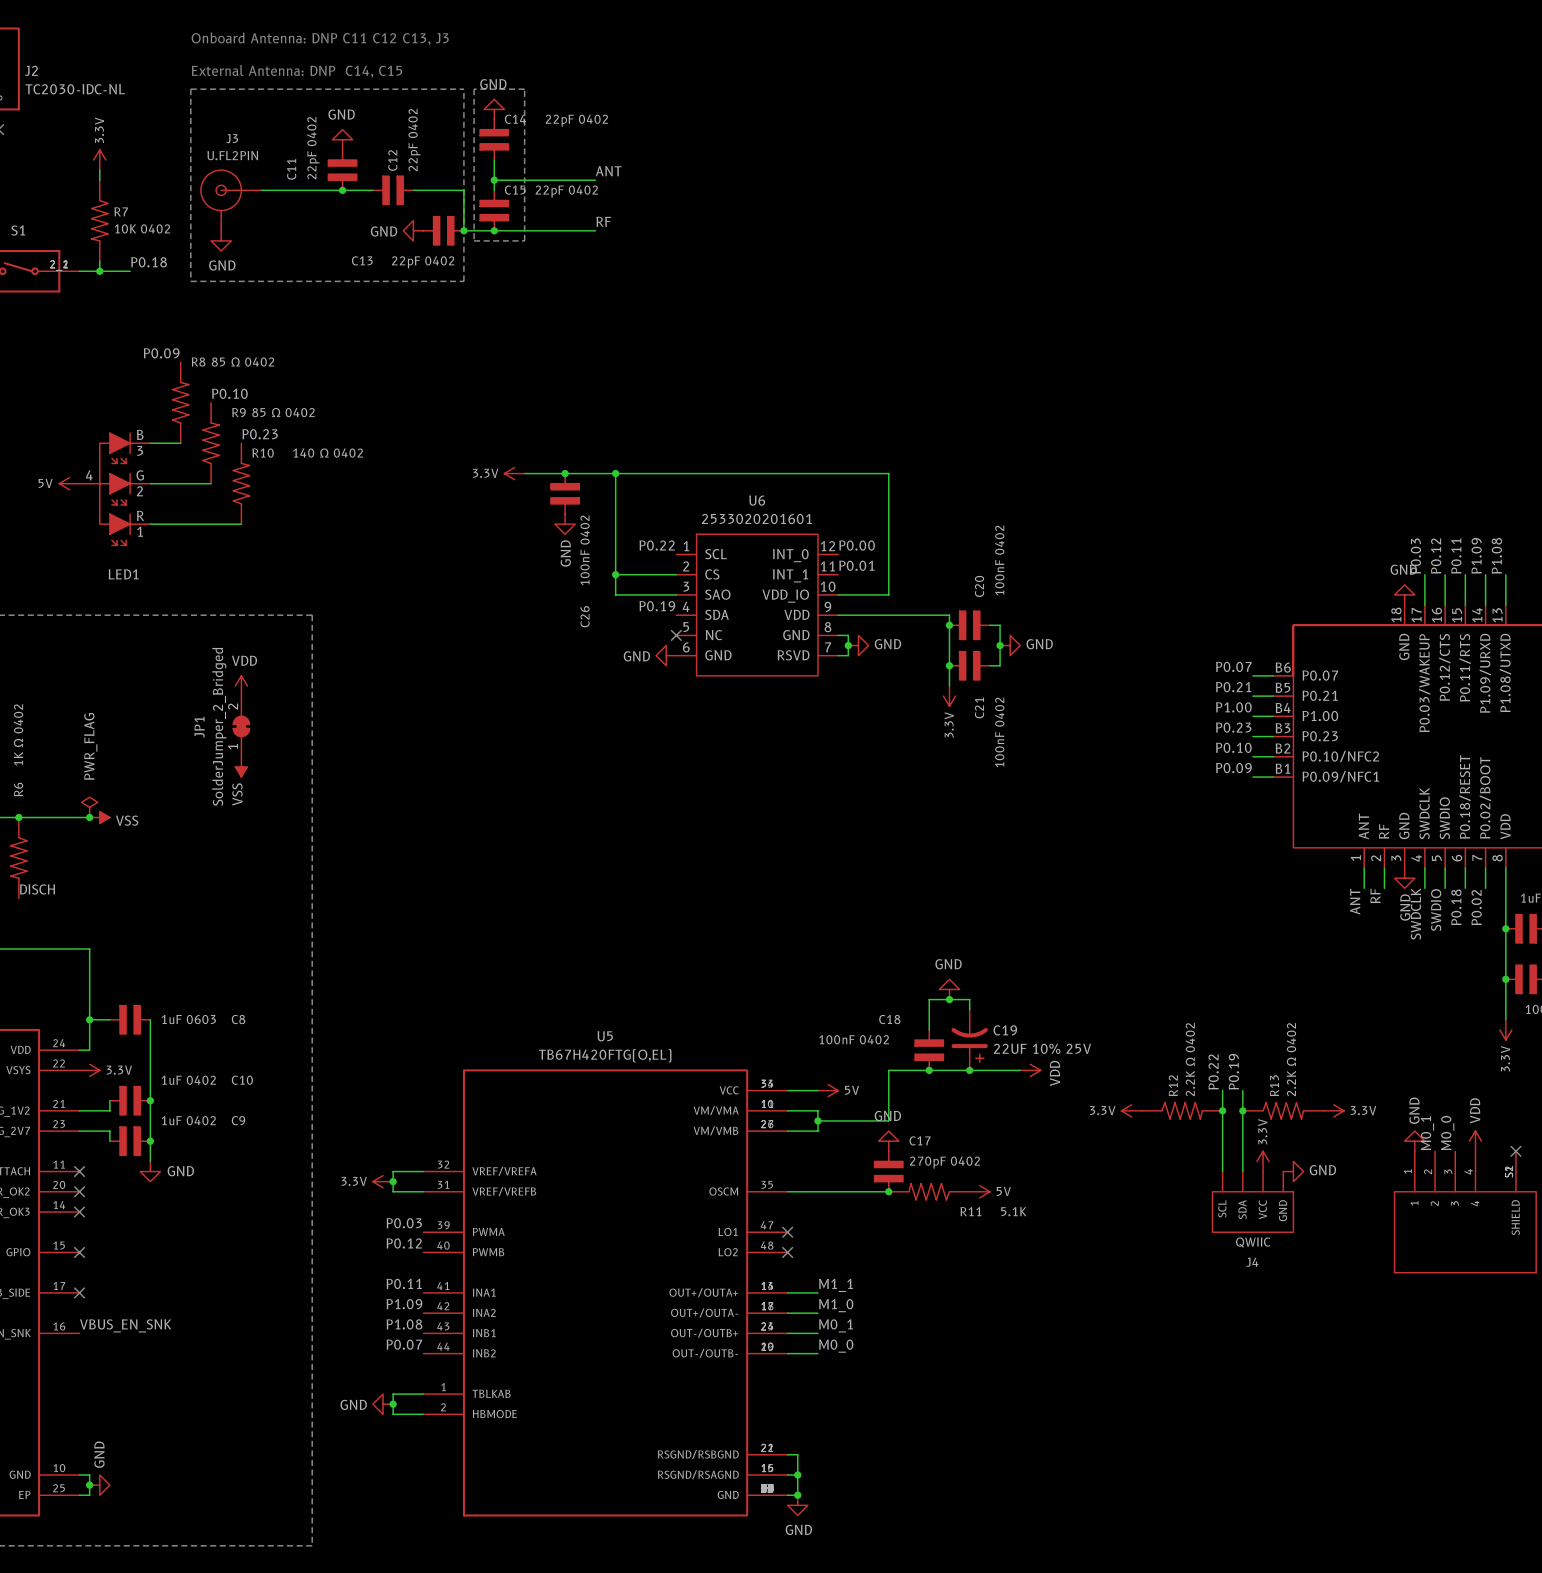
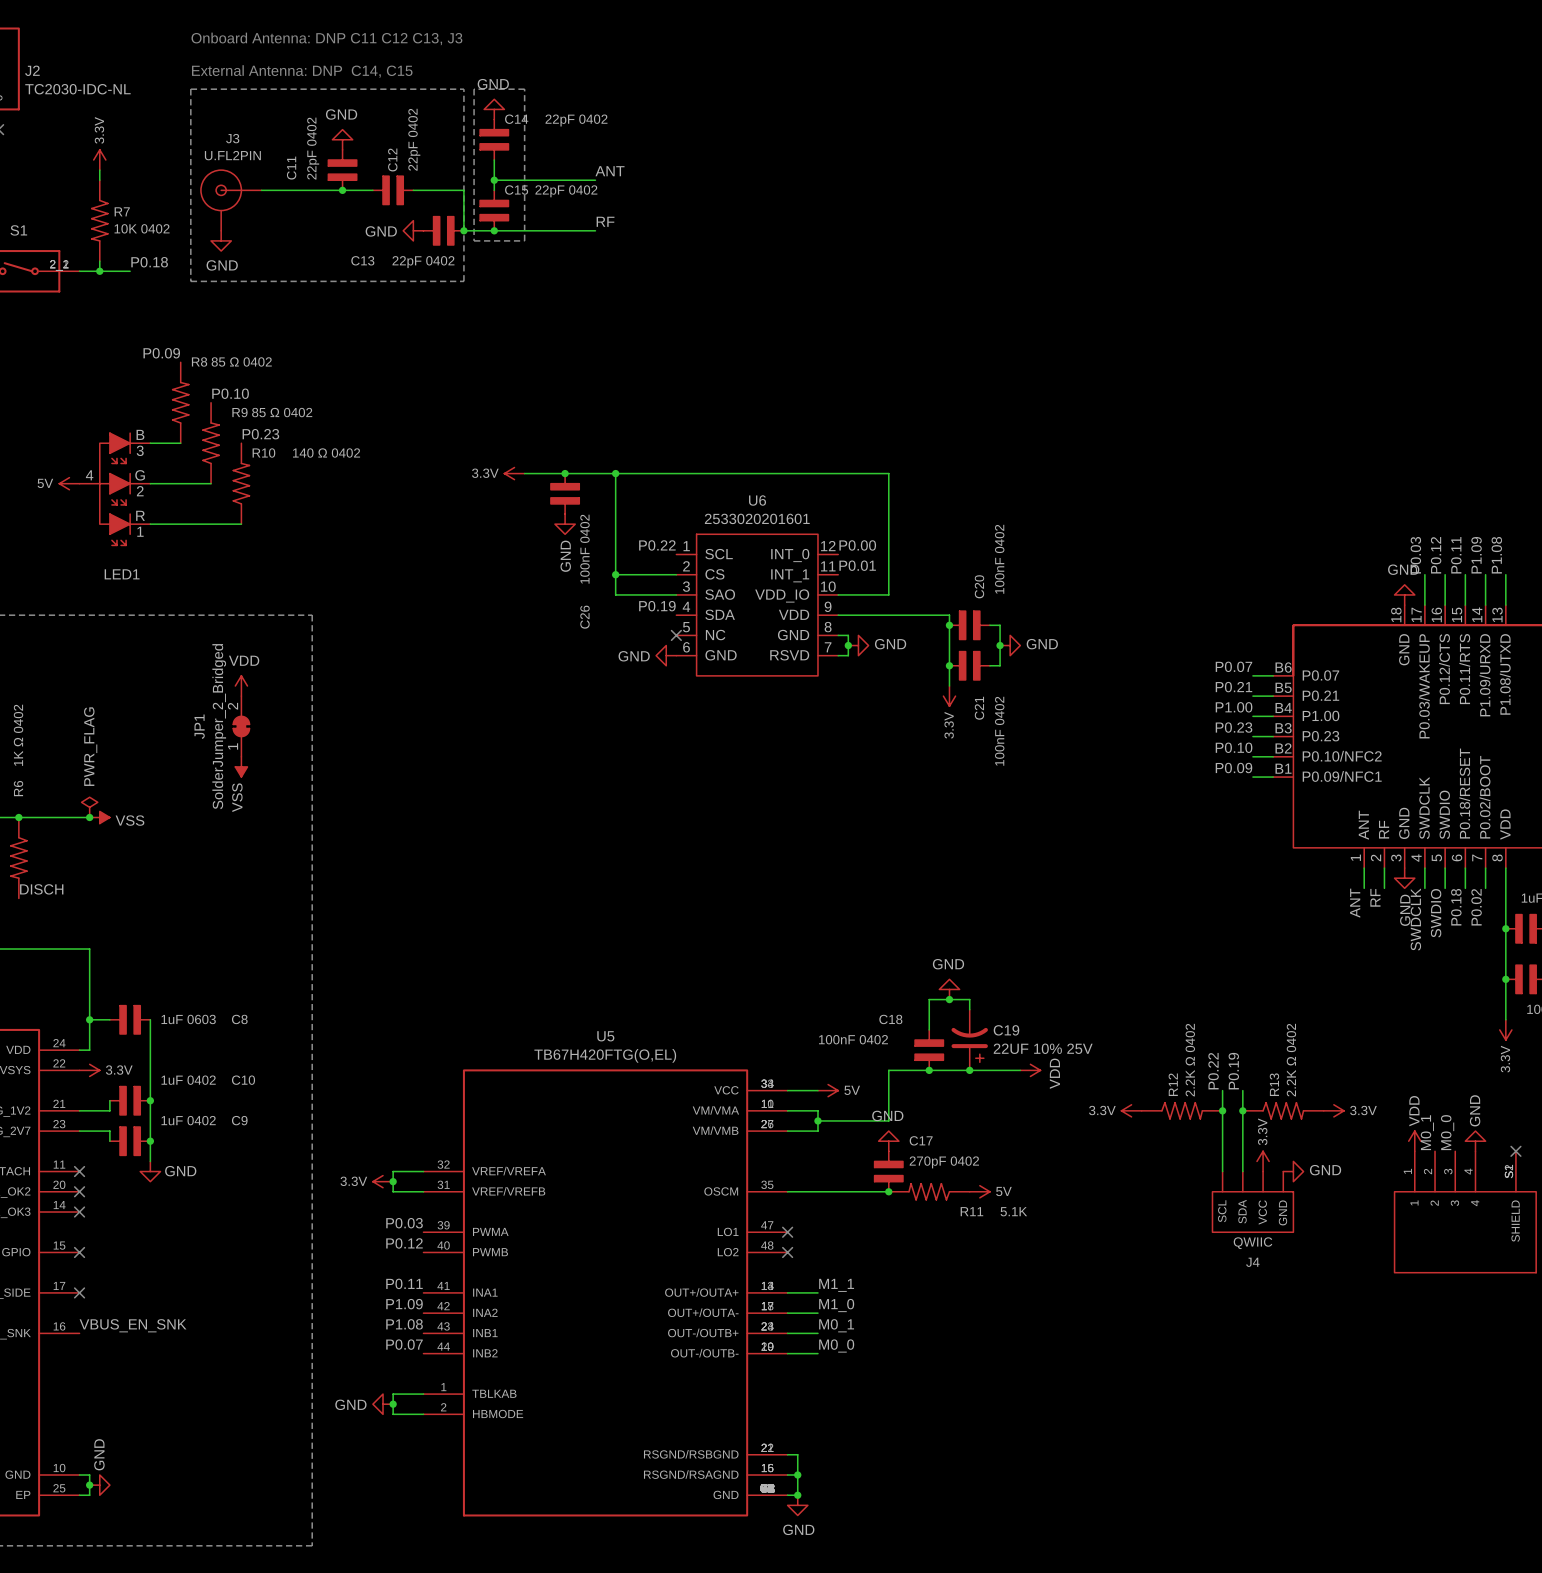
power symbol: GND (1414, 1141) -> VDD (1414, 1141)
power symbol: VDD (1475, 1141) -> GND (1475, 1141)

